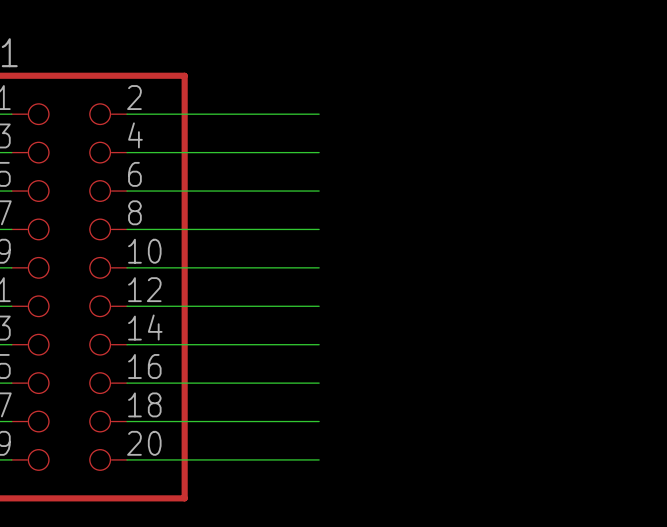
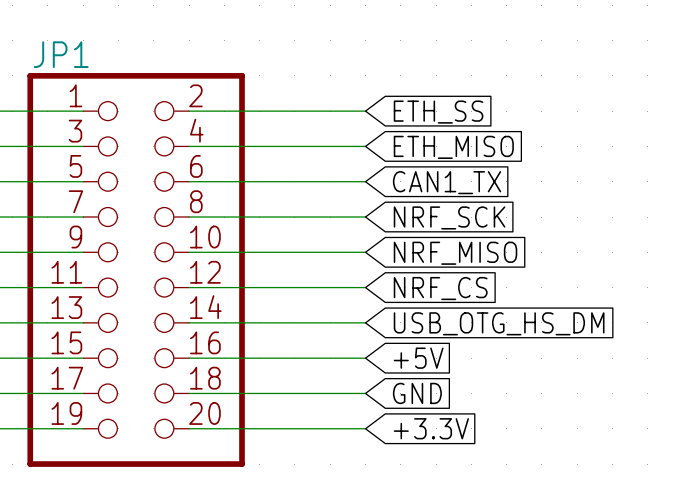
global label: none -> ETH_SS (438, 112)
global label: none -> ETH_MISO (453, 147)
global label: none -> CAN1_TX (447, 182)
global label: none -> NRF_SCK (449, 217)
global label: none -> NRF_MISO (455, 253)
global label: none -> NRF_CS (440, 288)
global label: none -> USB_OTG_HS_DM (499, 323)
global label: none -> +5V (418, 358)
global label: none -> GND (417, 393)
global label: none -> +3.3V (431, 428)

